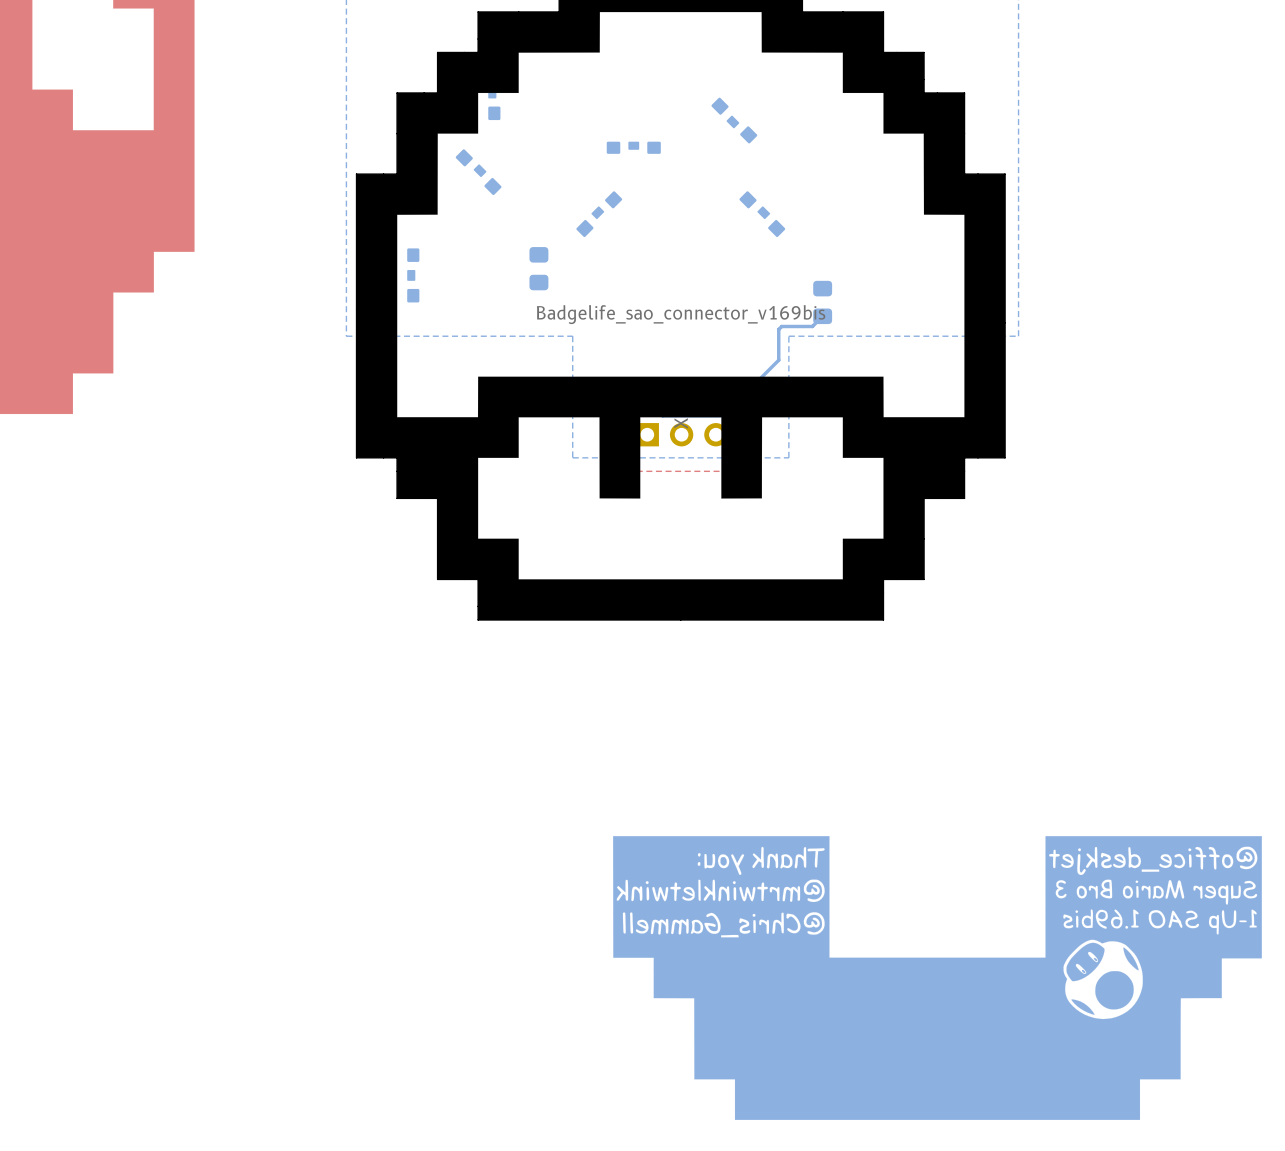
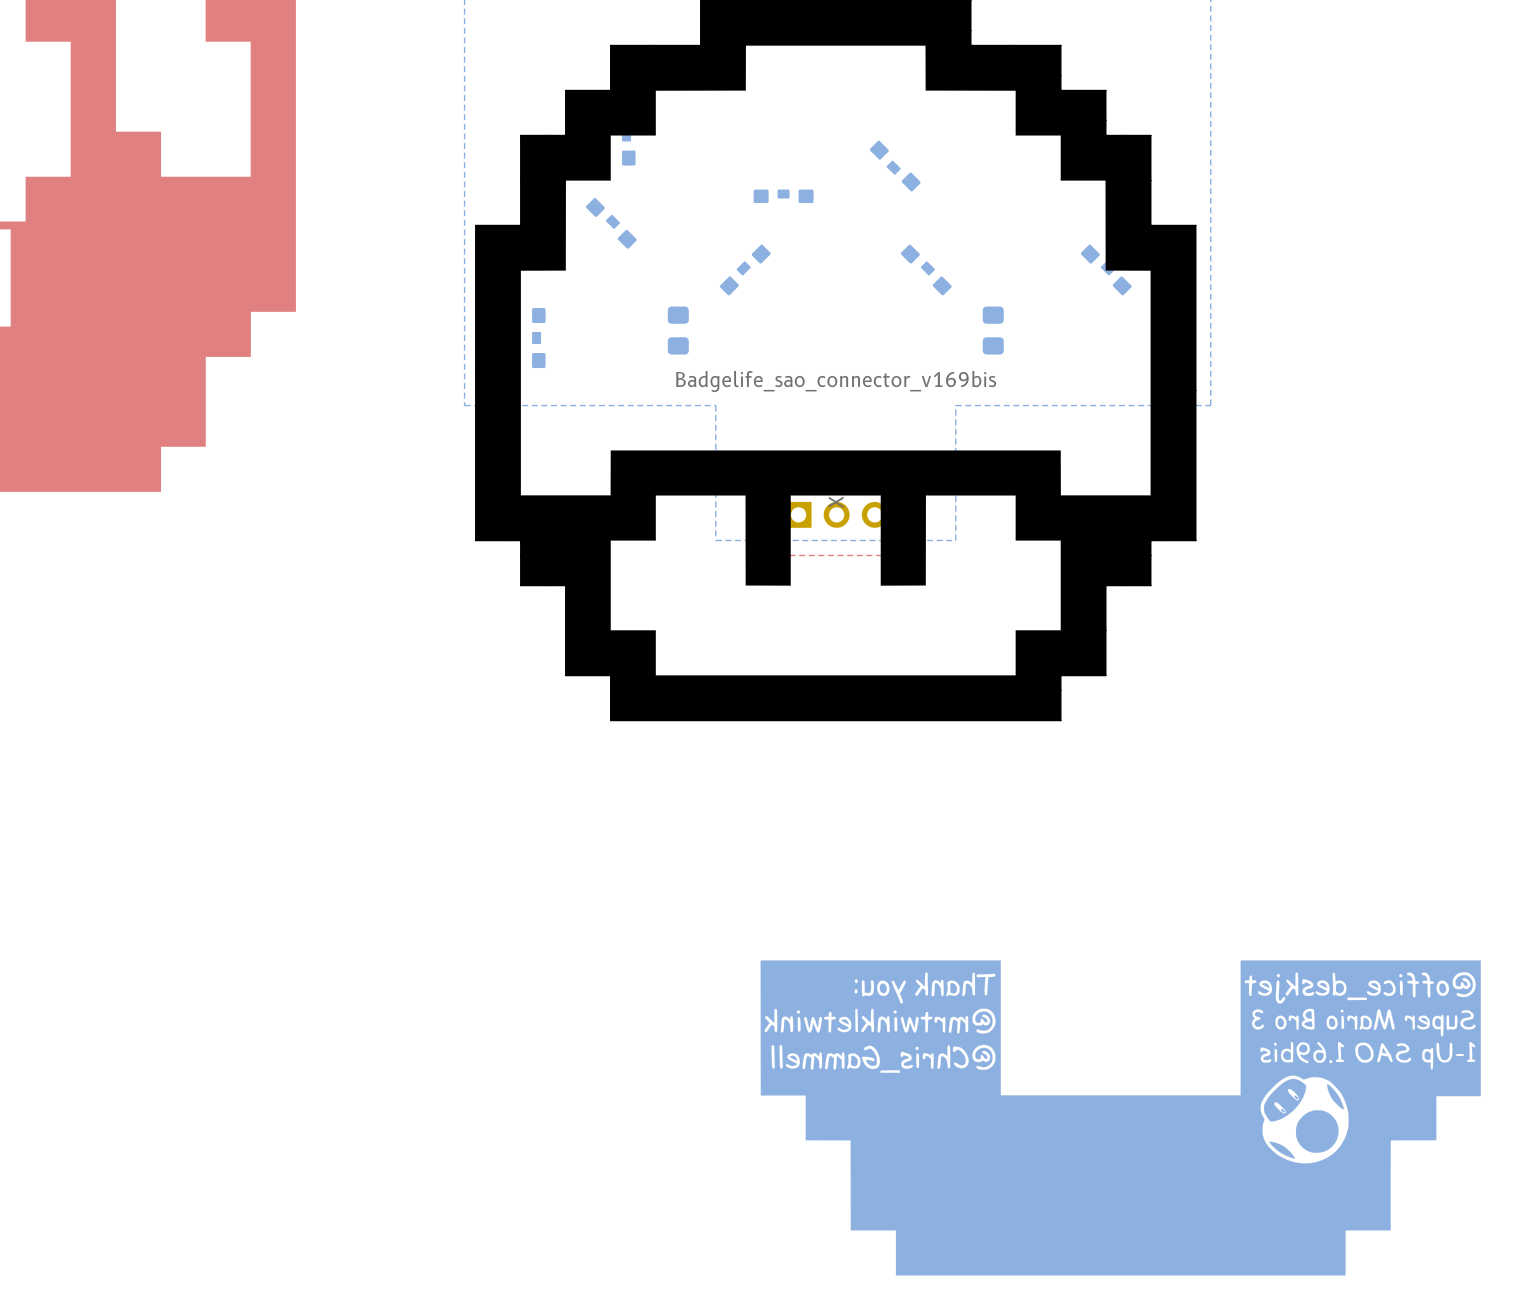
part: none -> (1106, 270)
part position: (822, 302) -> (993, 330)
bottom track: (822, 316) (812, 326) (781, 326) (778, 329) (778, 360) (723, 415) (662, 415) (647, 400) -> none

